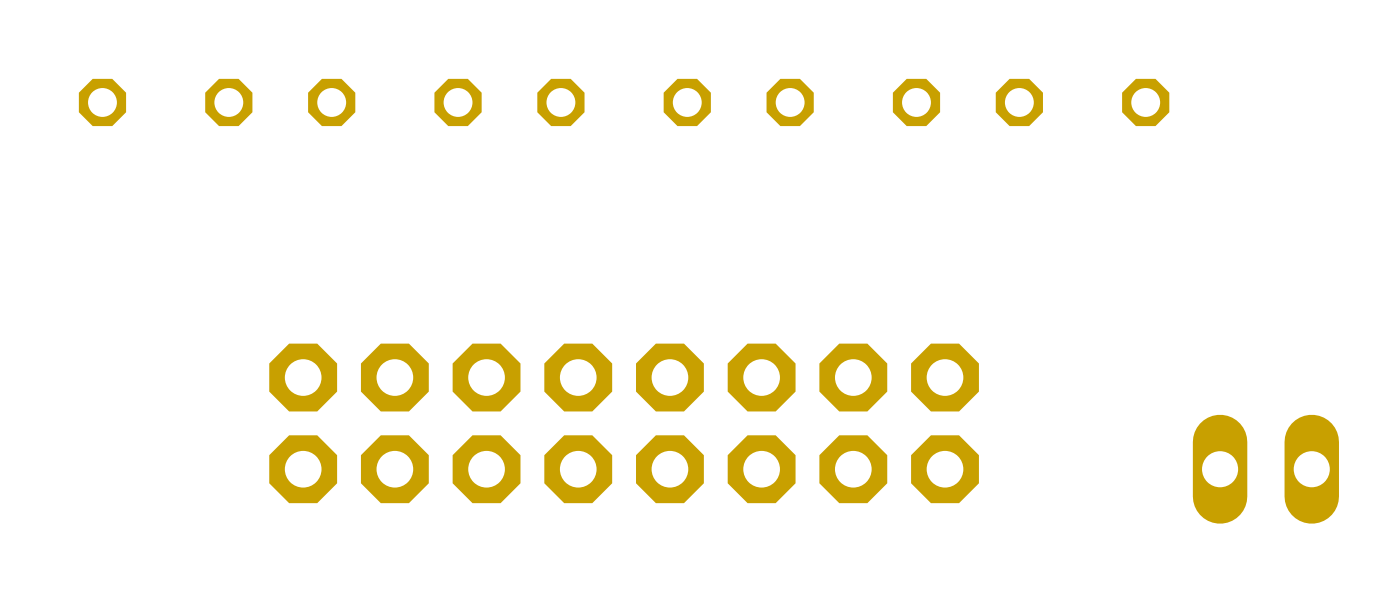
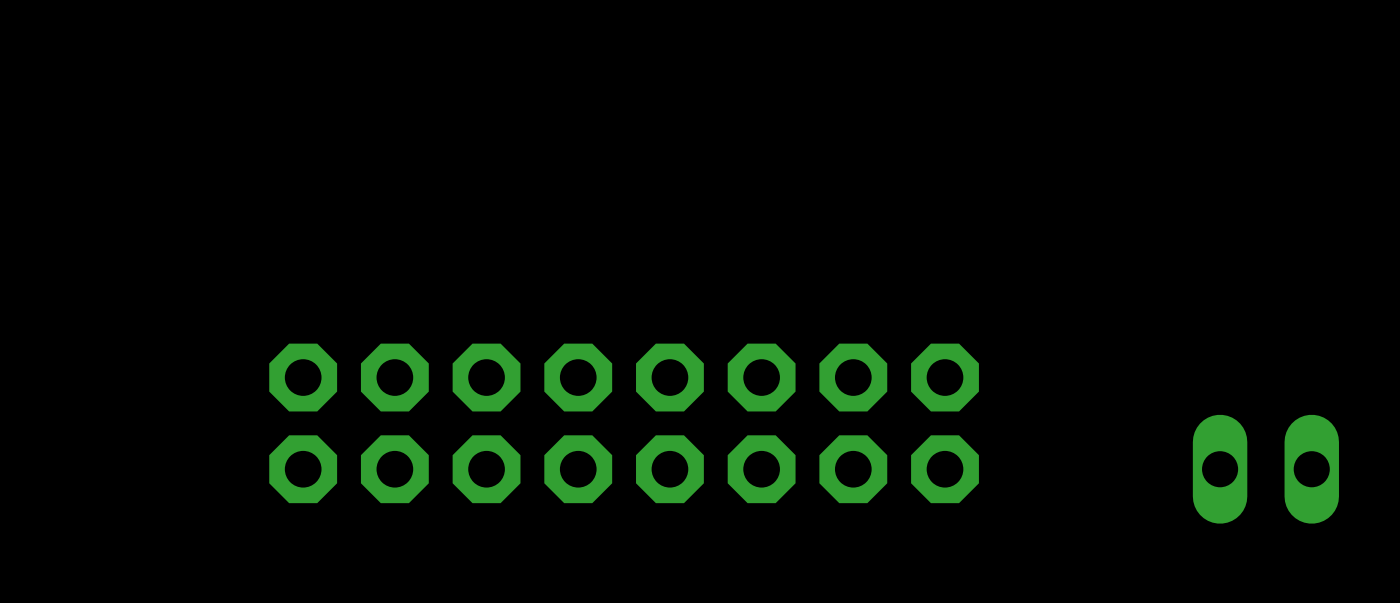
part: (165, 102) -> none
part: (394, 102) -> none
part: (624, 102) -> none
part: (853, 102) -> none
part: (1082, 102) -> none

